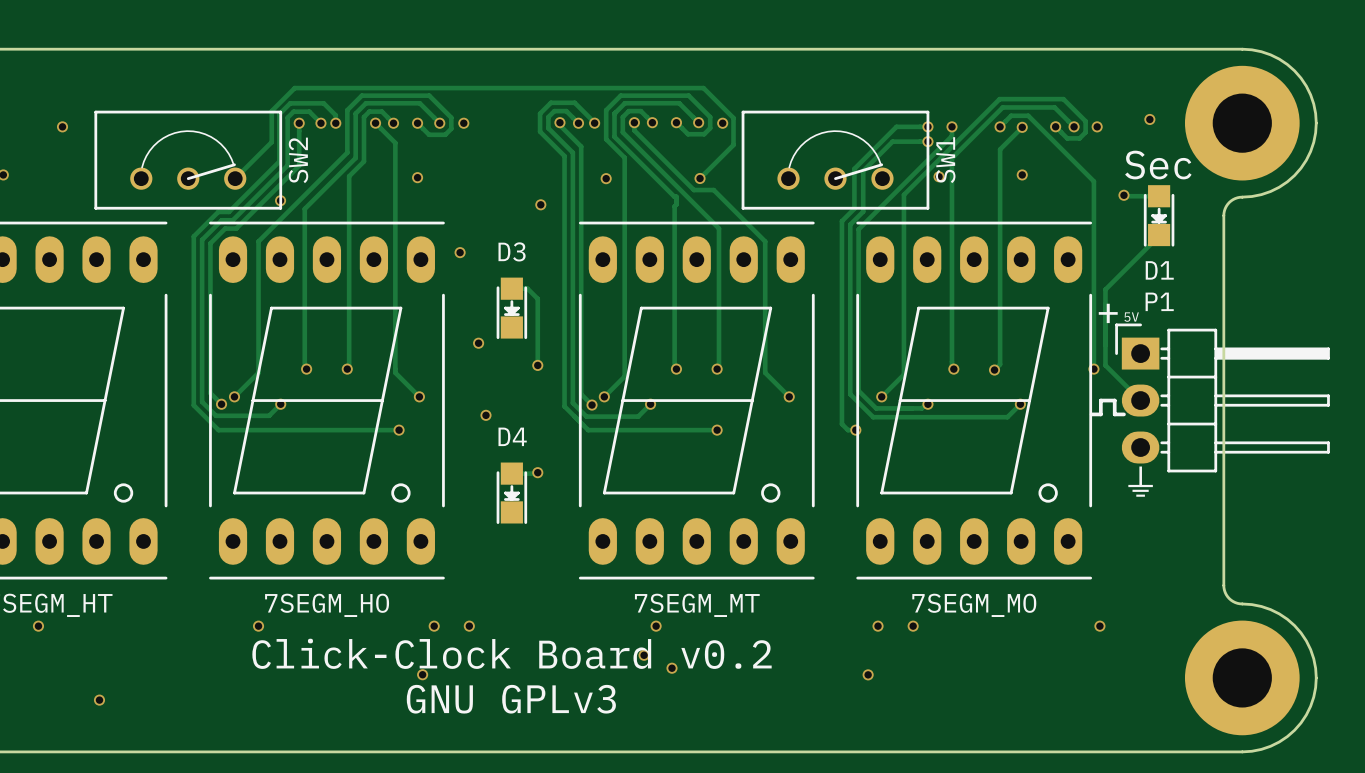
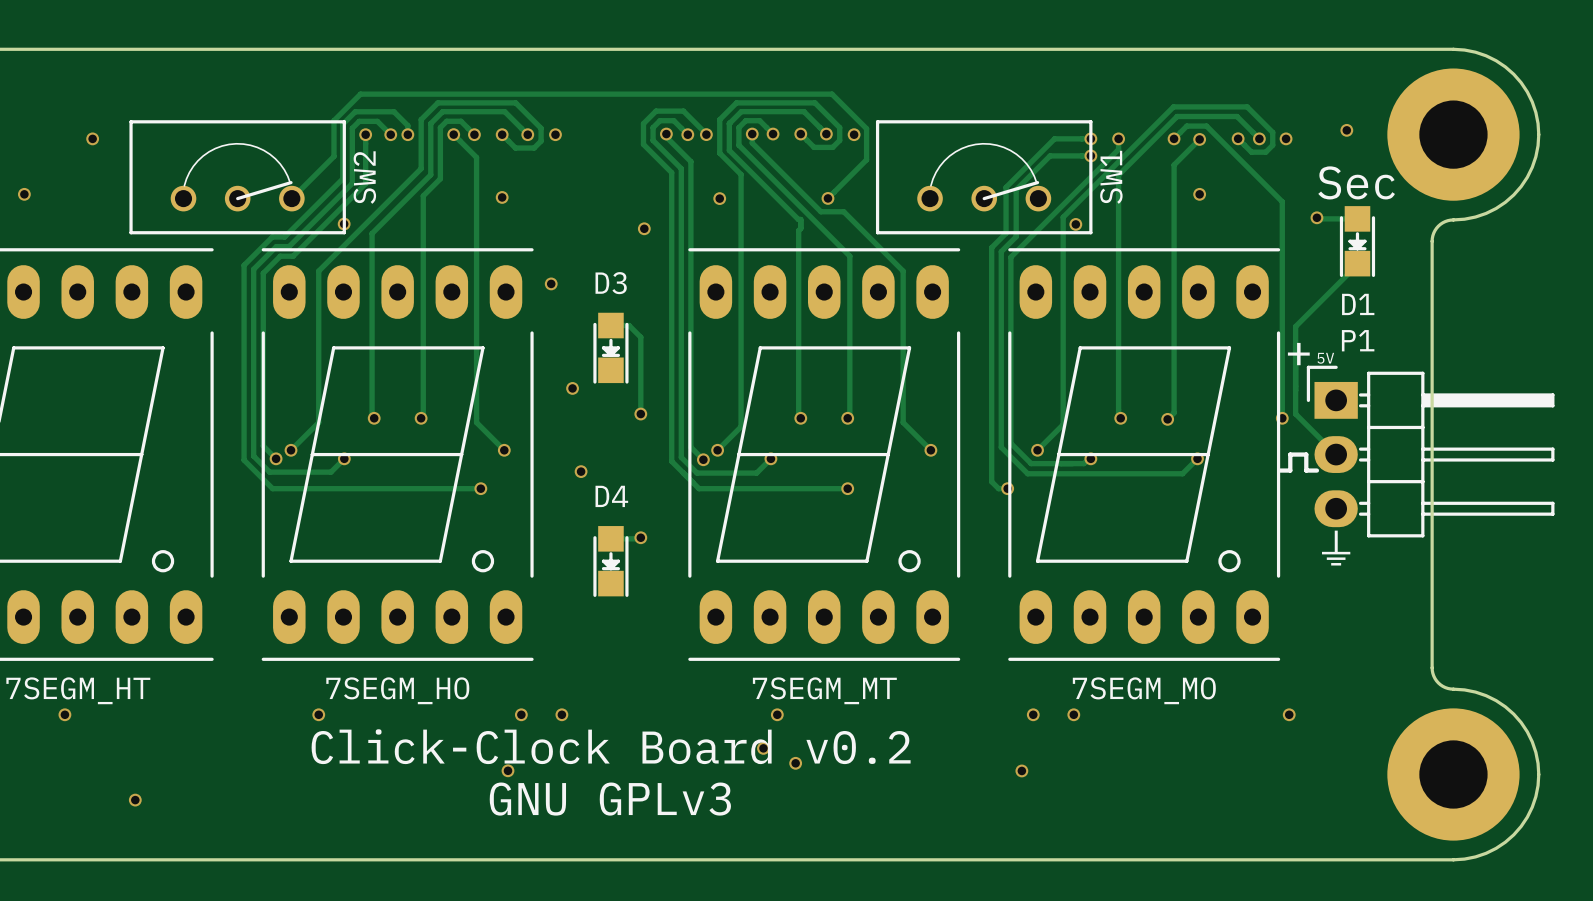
via position: (939, 176) -> (1075, 224)

